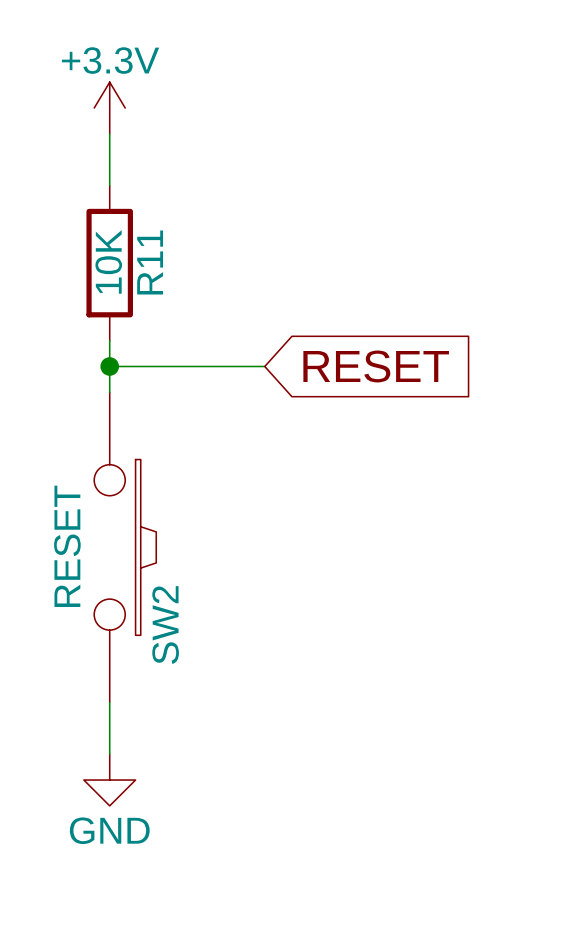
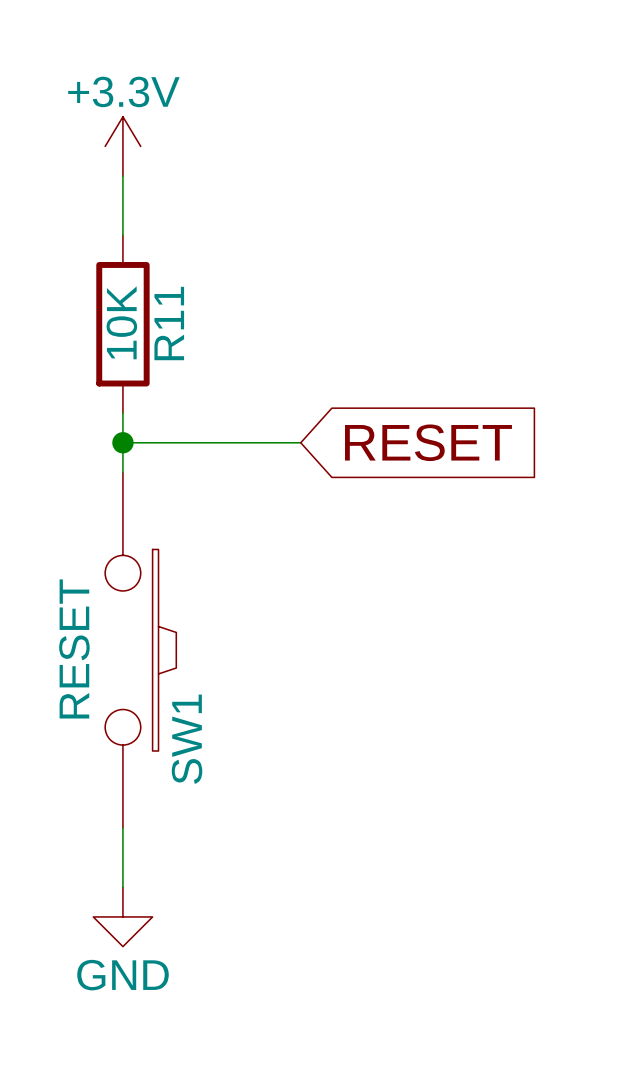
SW2 name: SW2 (165, 625) -> SW1 (187, 739)

